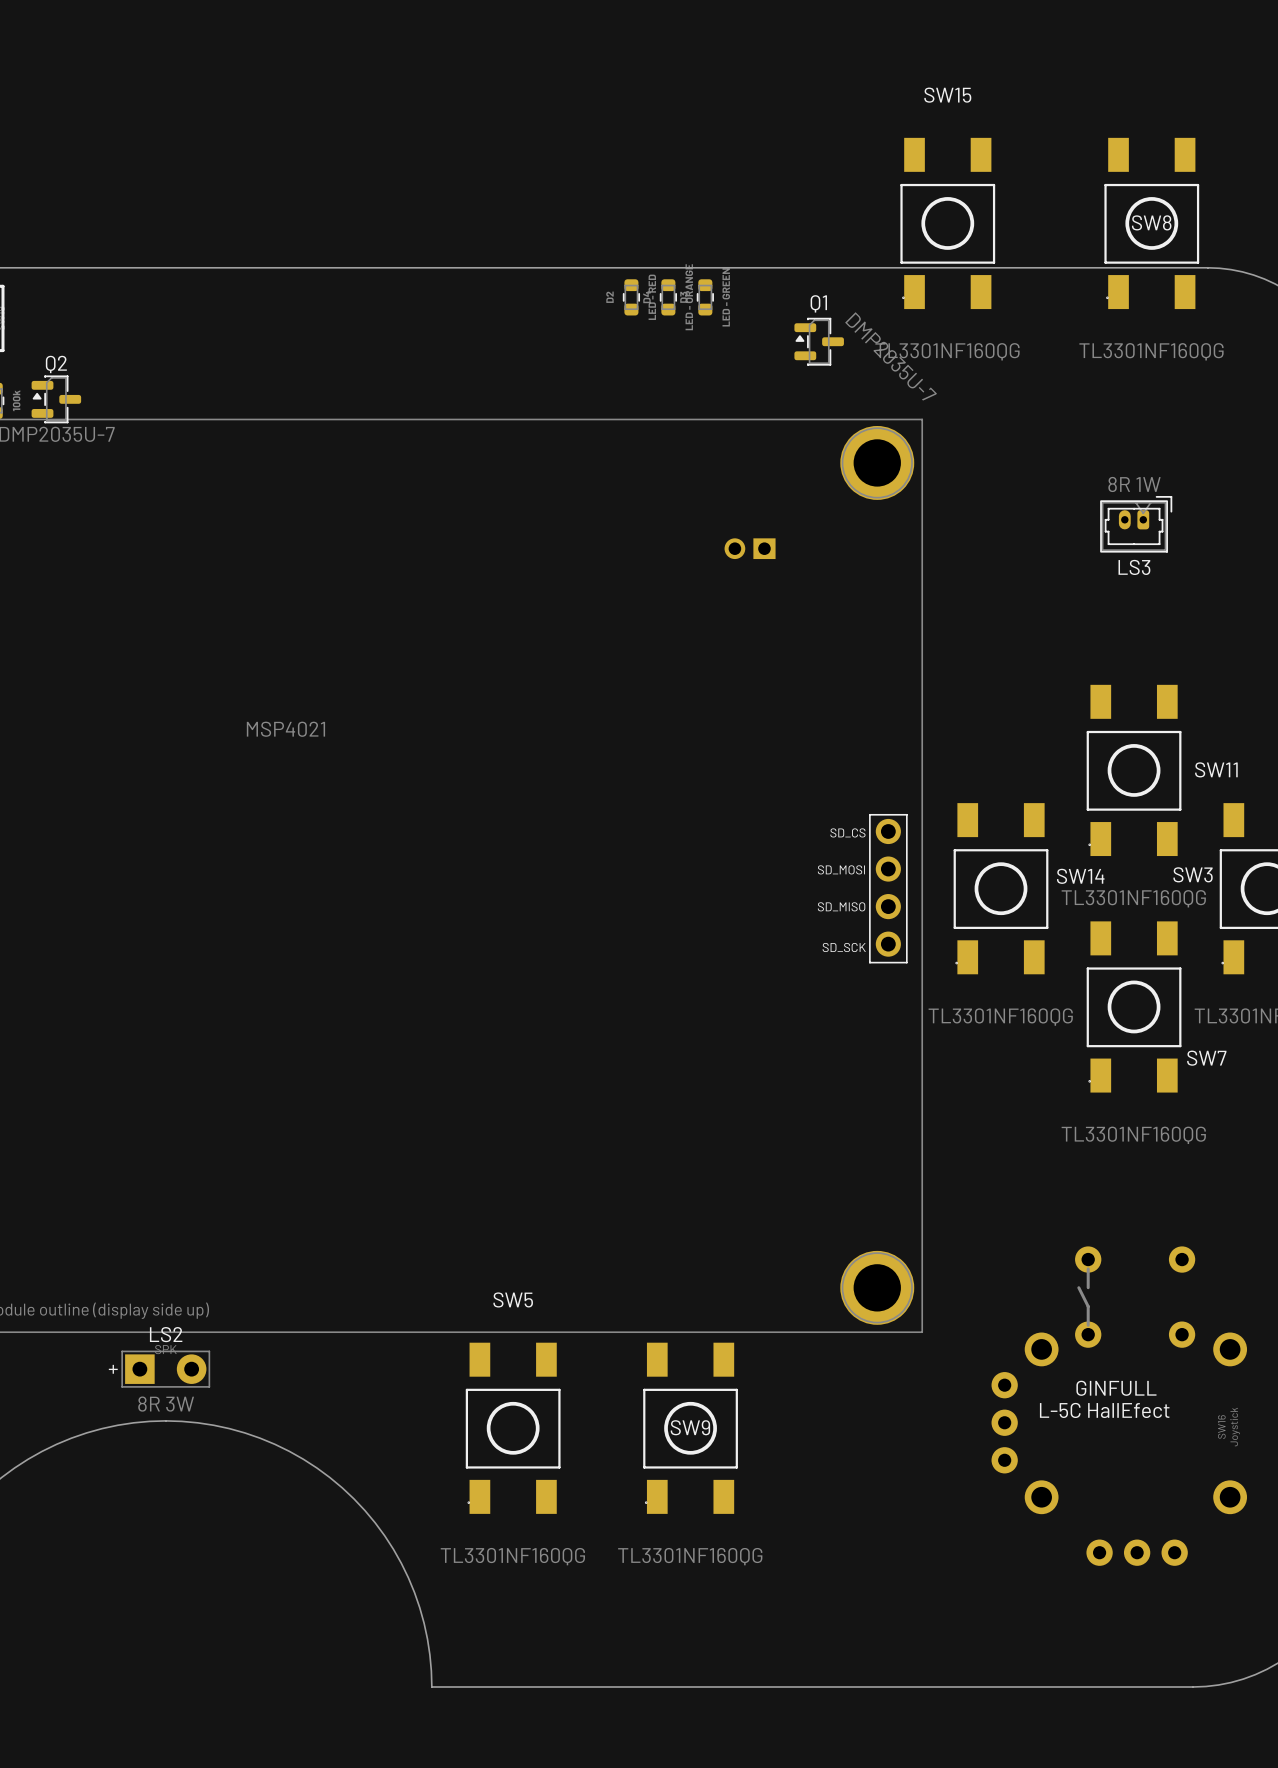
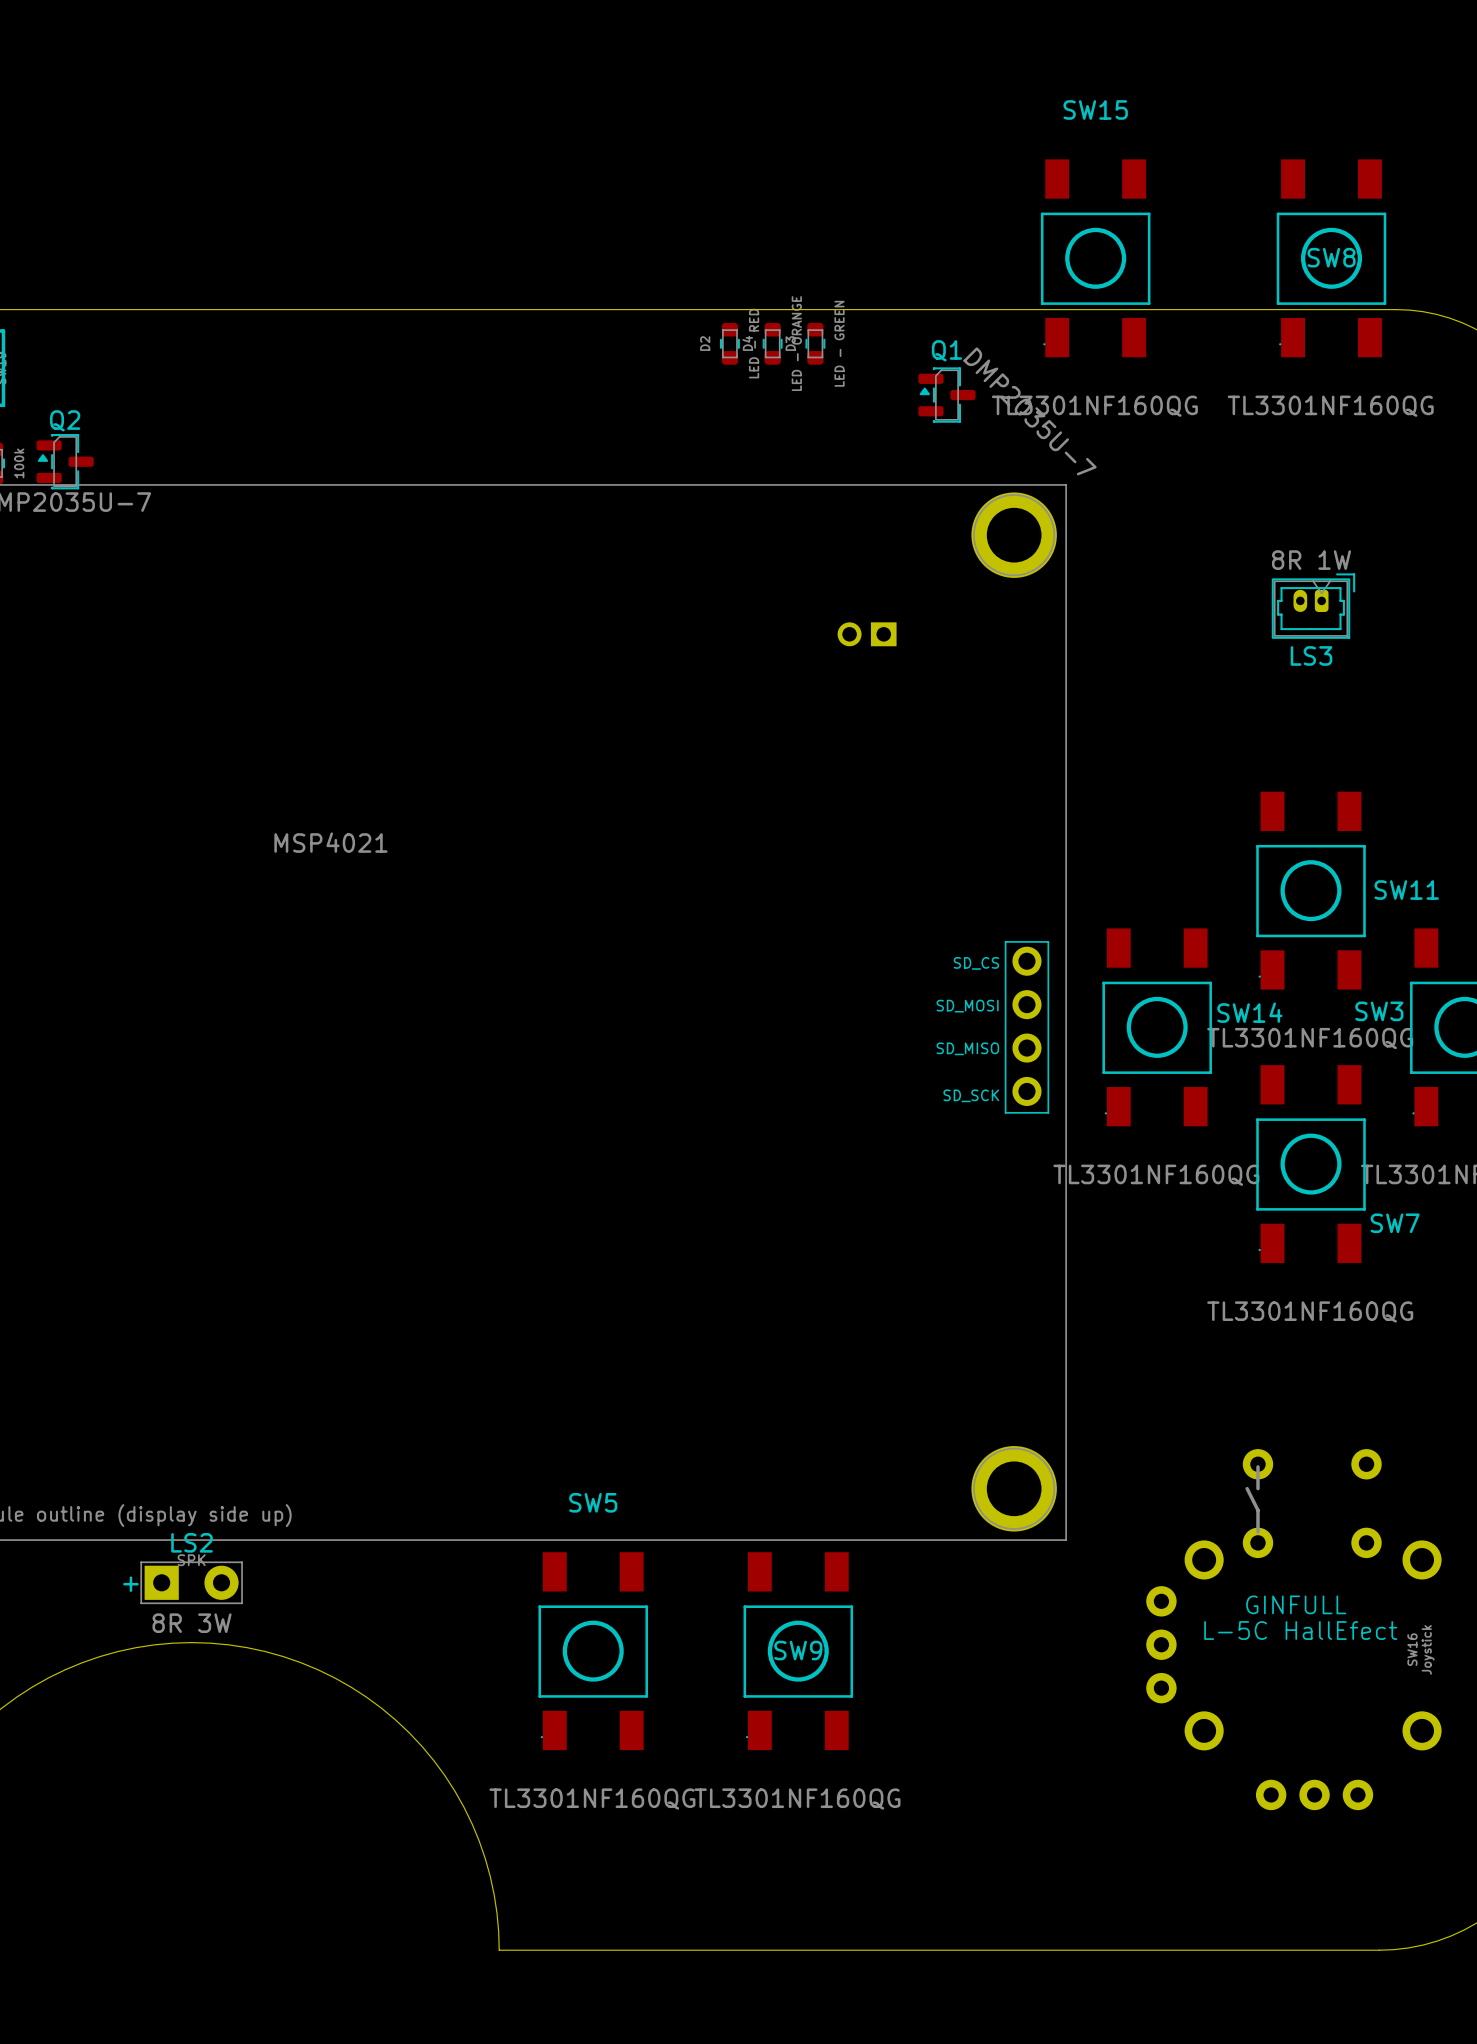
SW16 footprint: [991, 1246, 1248, 1566] -> [1146, 1449, 1442, 1811]

